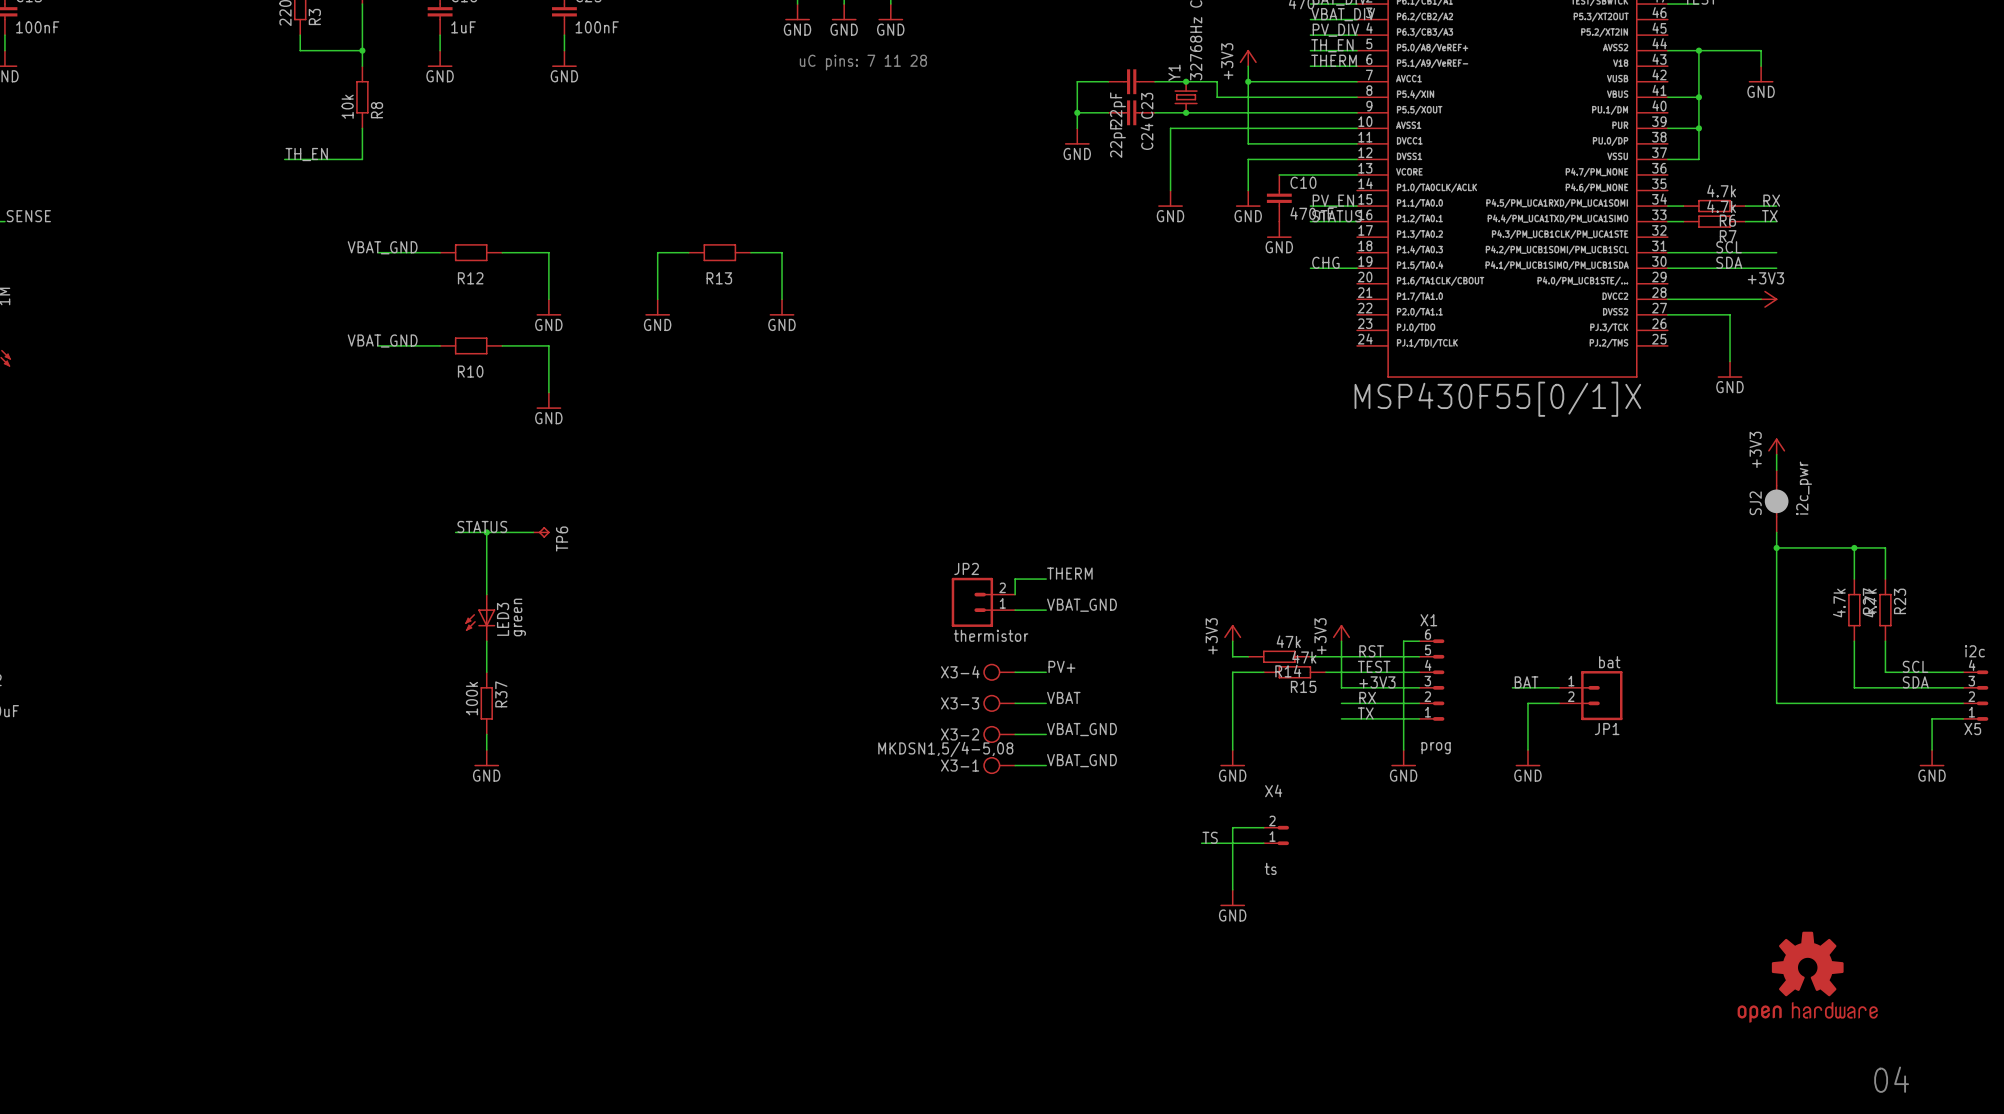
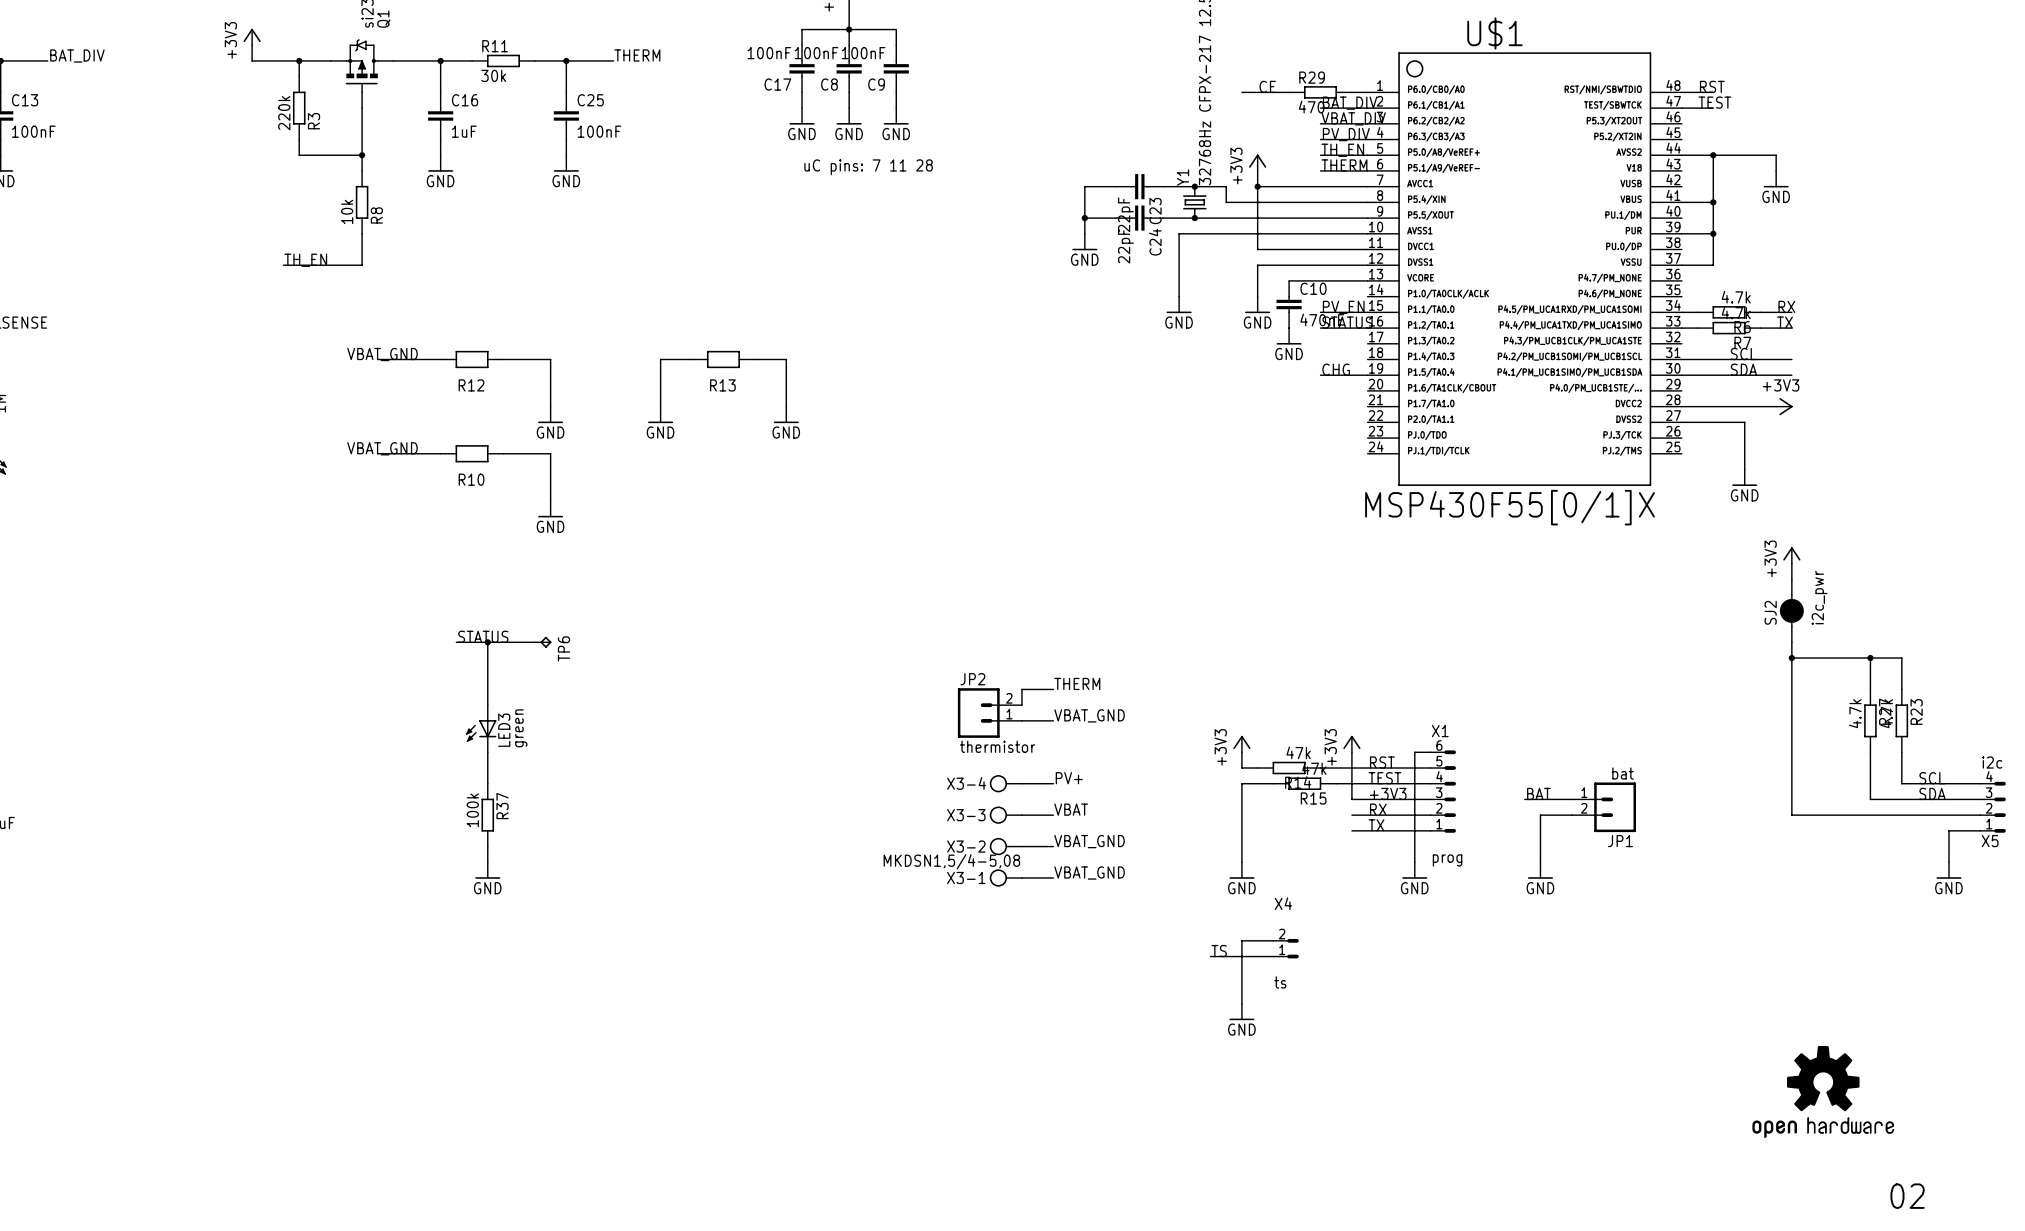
text: 04 (1891, 1079) -> 02 (1907, 1196)

